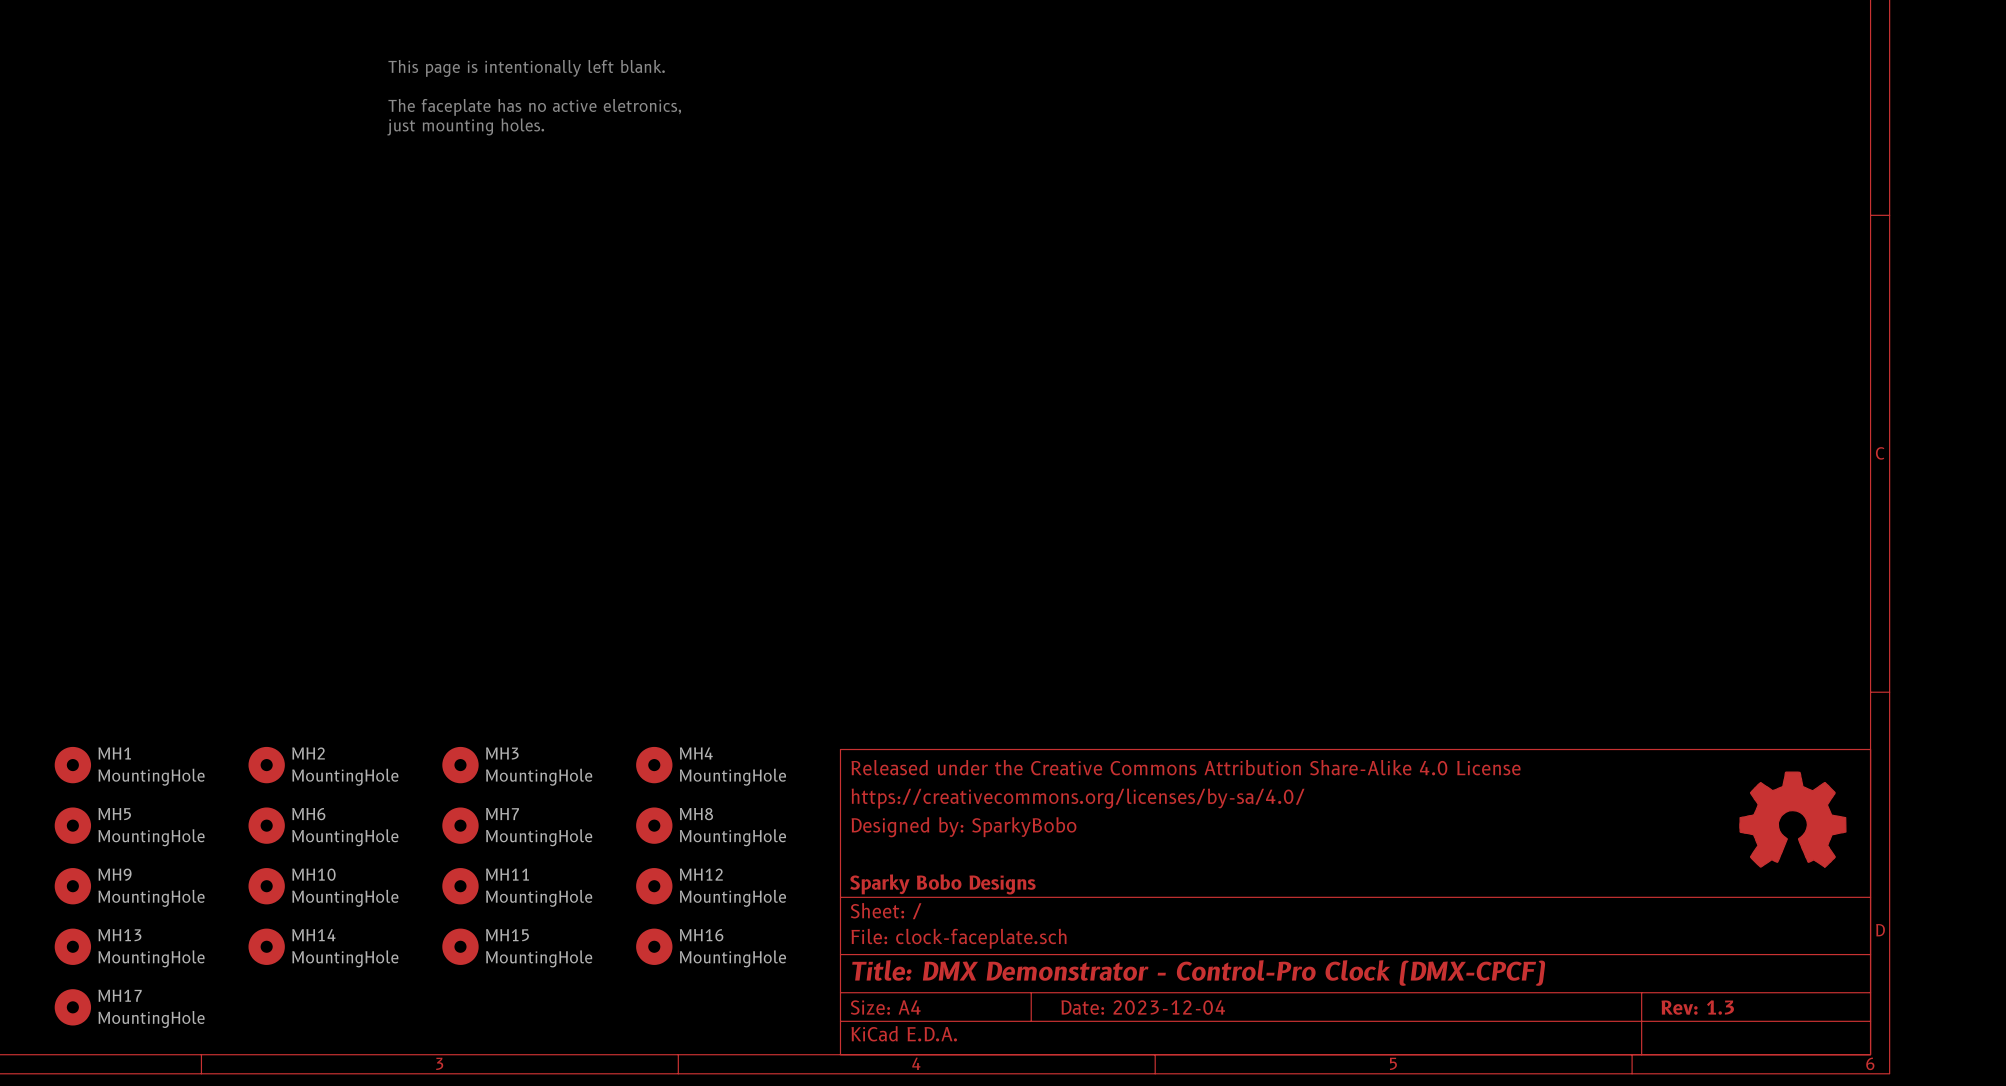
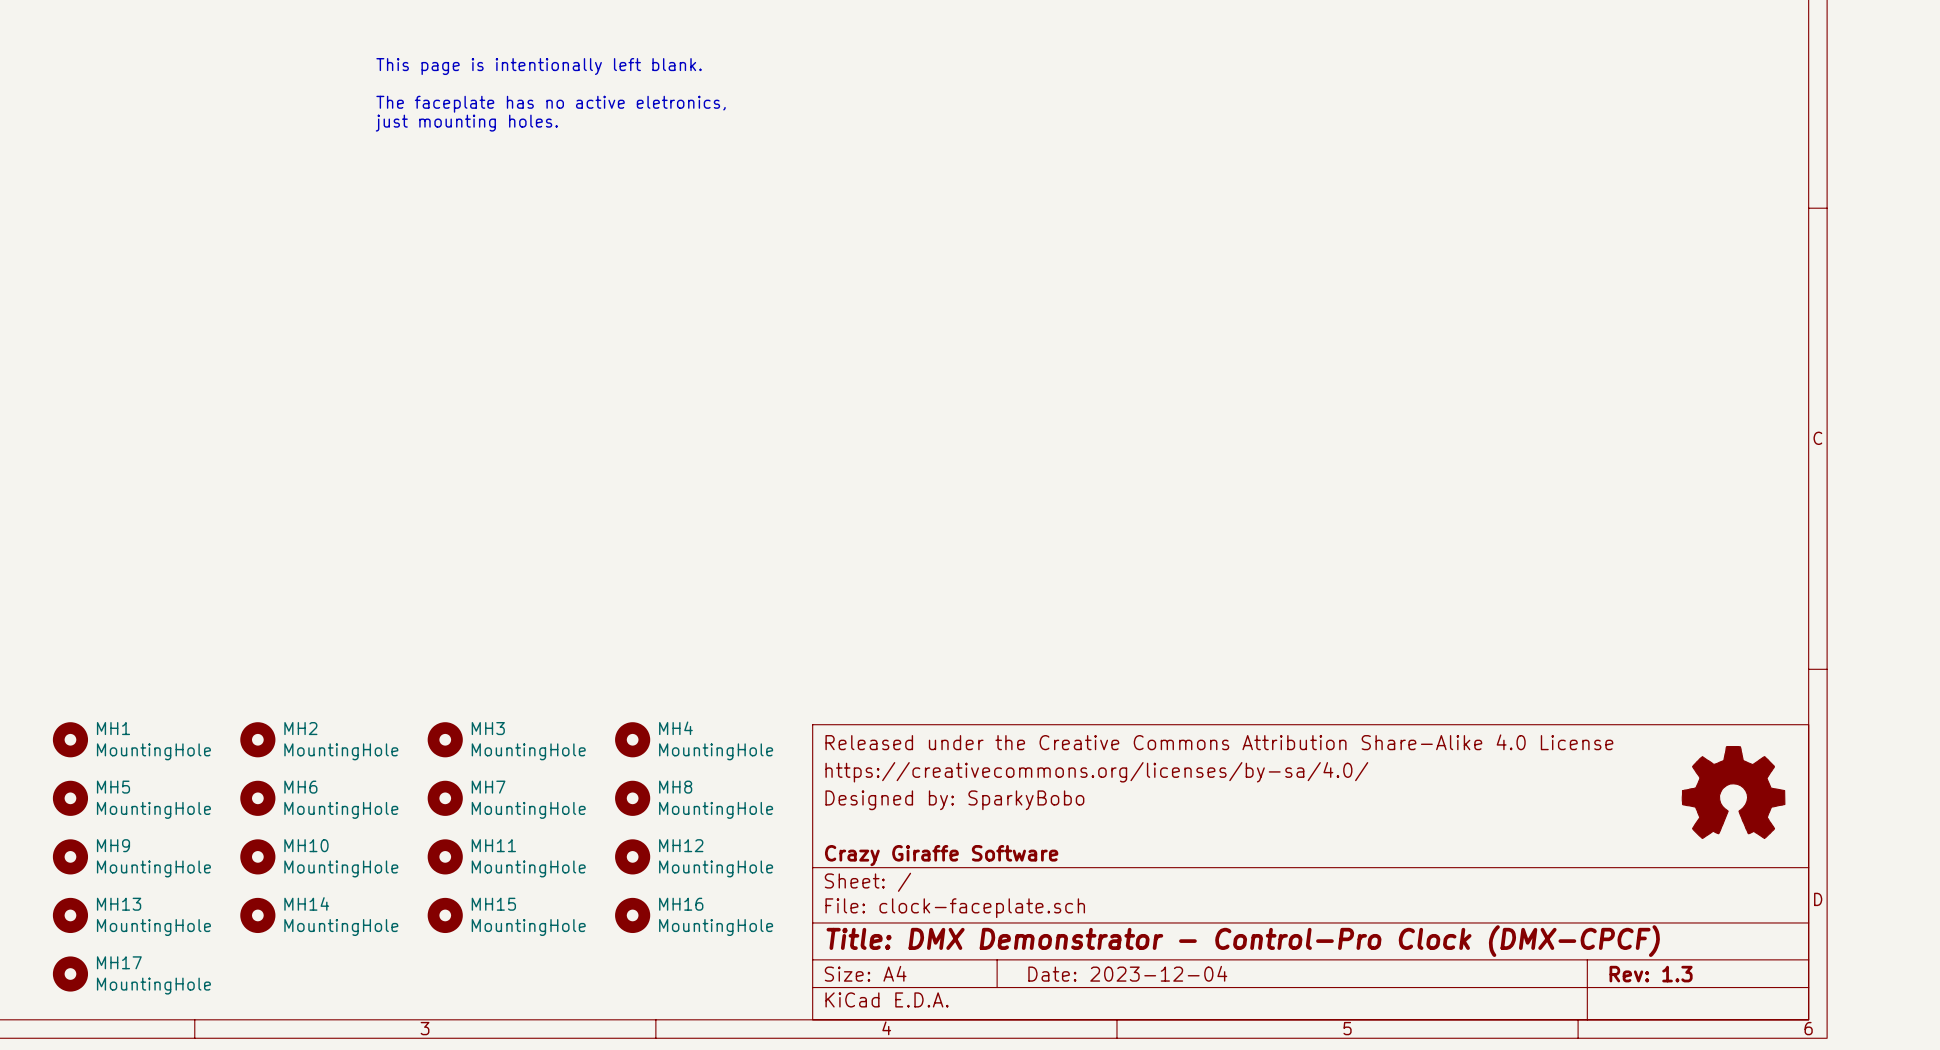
title block: Sparky Bobo Designs (942, 884) -> Crazy Giraffe Software (941, 855)

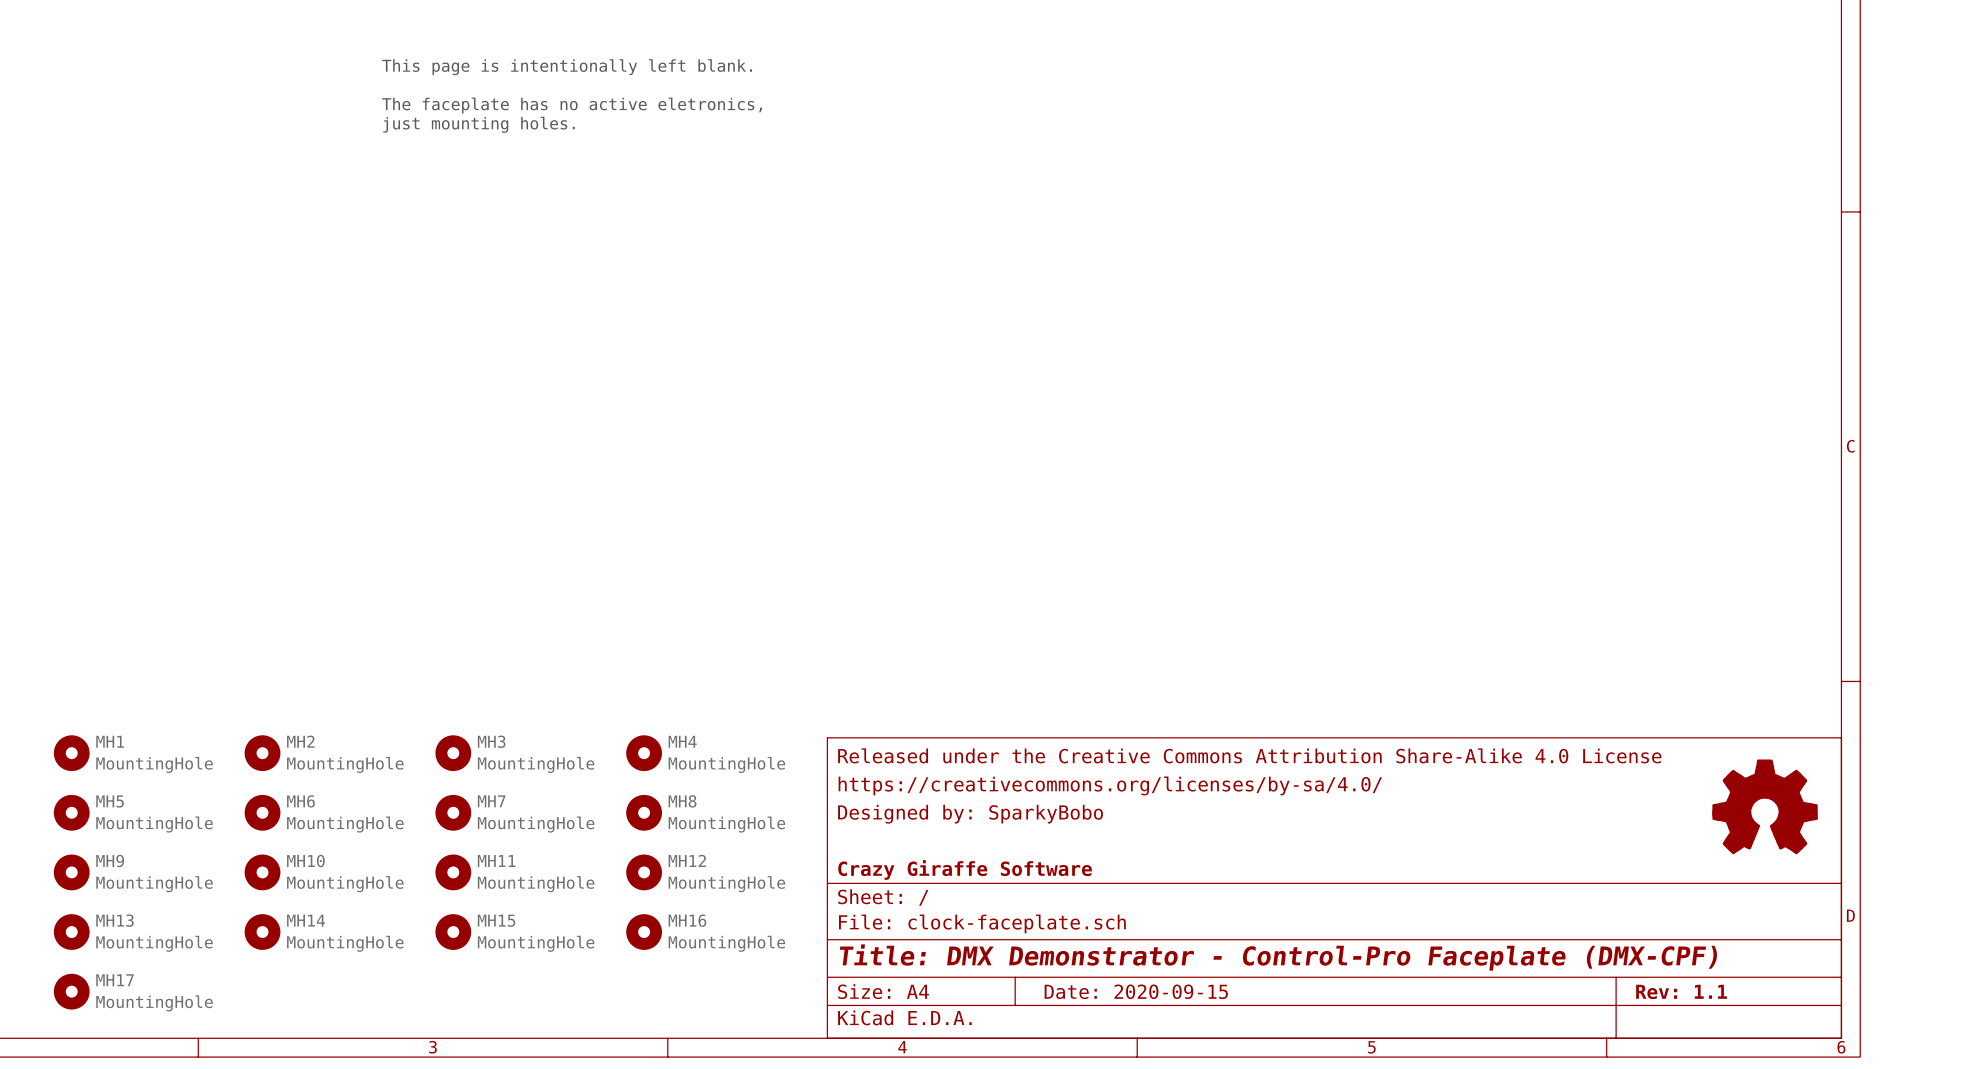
title block: Title: DMX Demonstrator - Control-Pro Clock (DMX-CPCF) (1243, 941) -> Title: DMX Demonstrator - Control-Pro Faceplate (DMX-CPF) (1278, 957)
title block: Date: 2023-12-04 (1127, 973) -> Date: 2020-09-15 (1136, 991)
title block: Rev: 1.3 (1651, 974) -> Rev: 1.1 (1681, 991)

